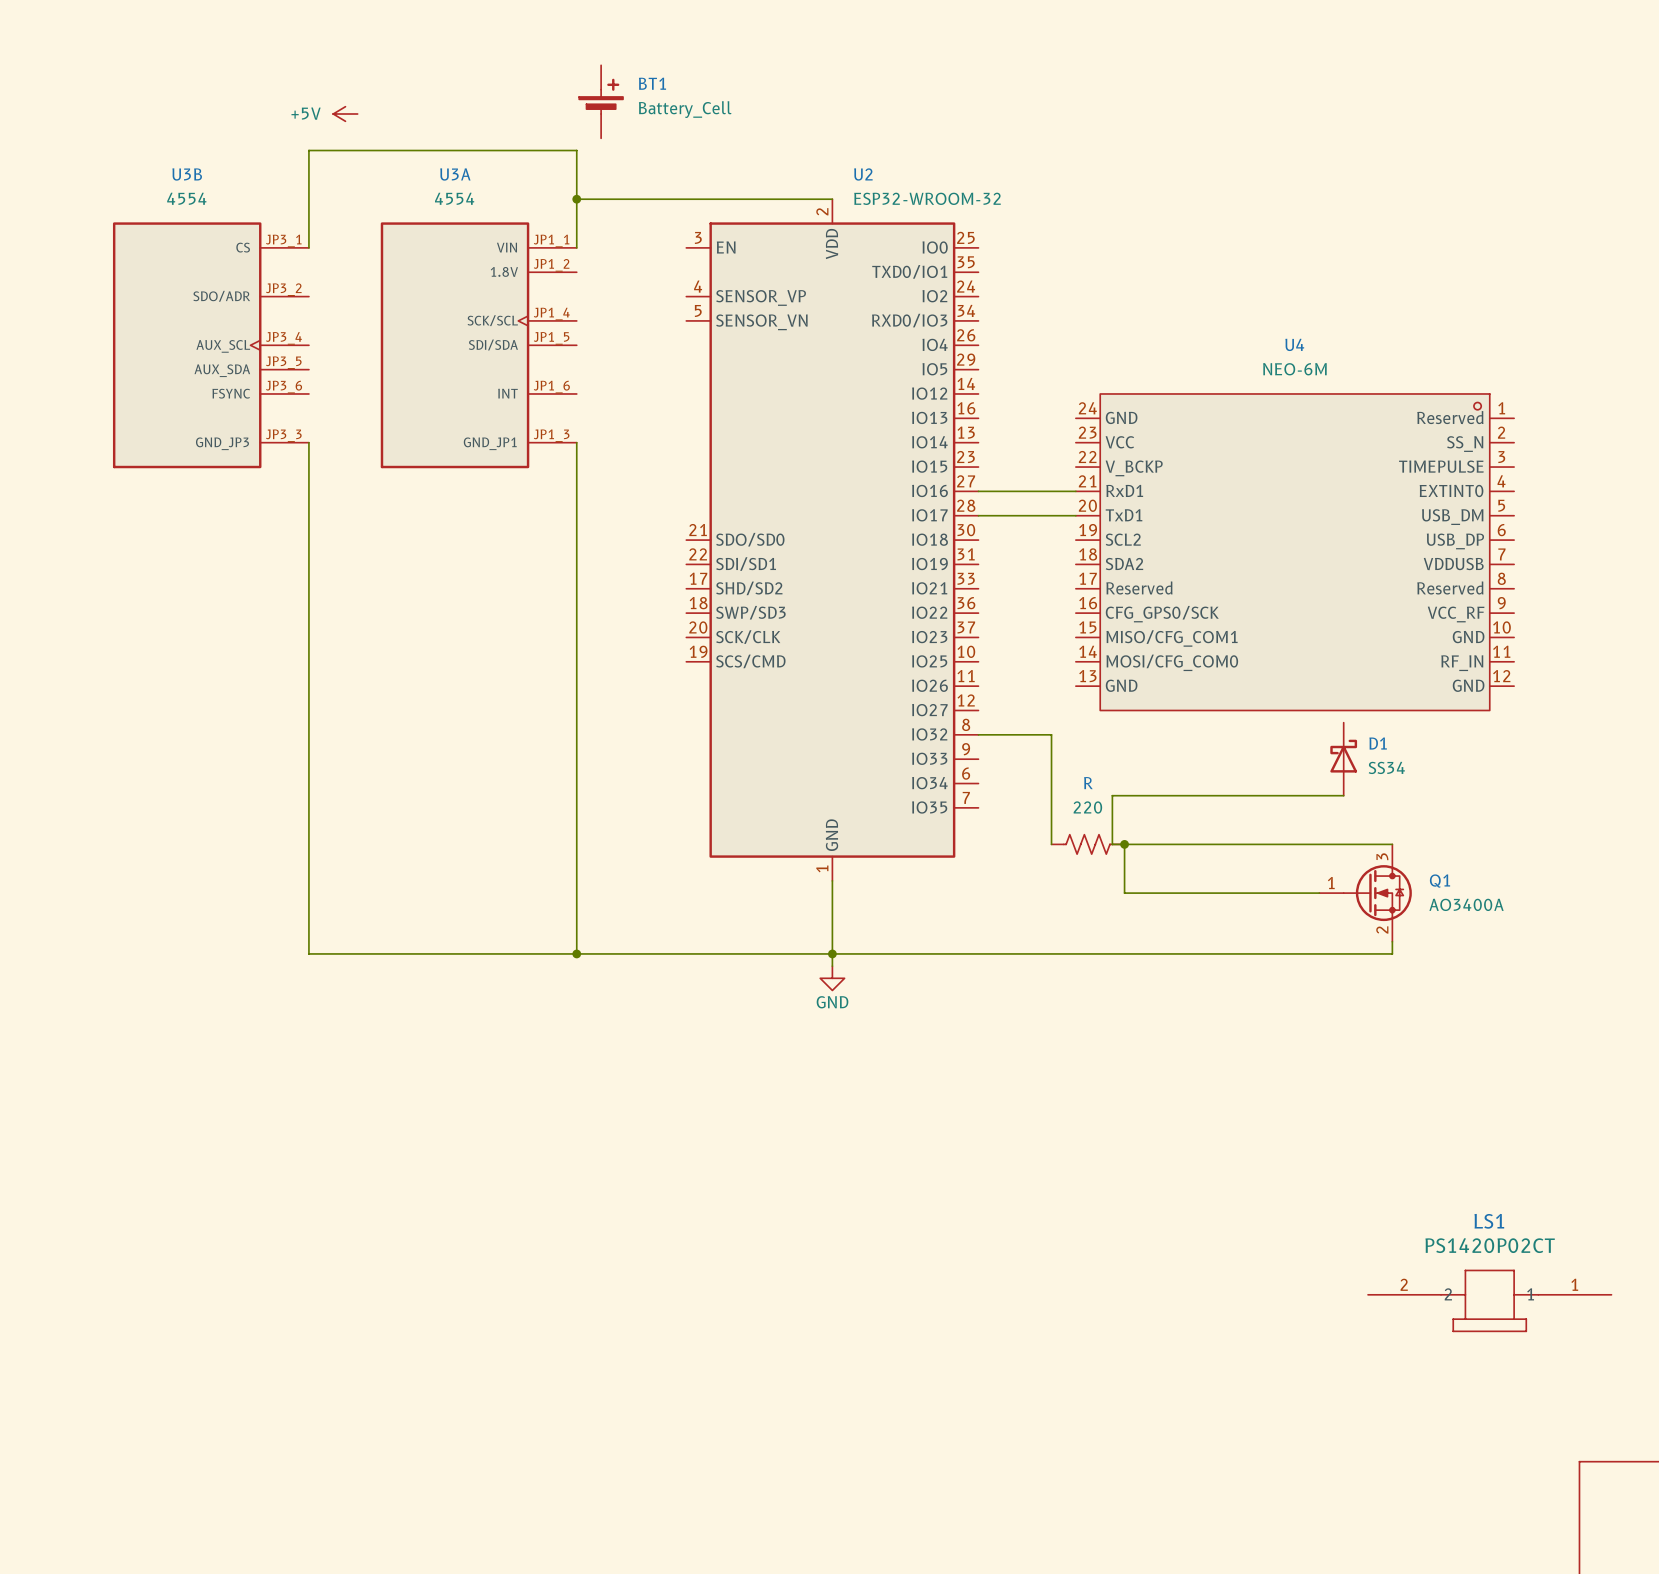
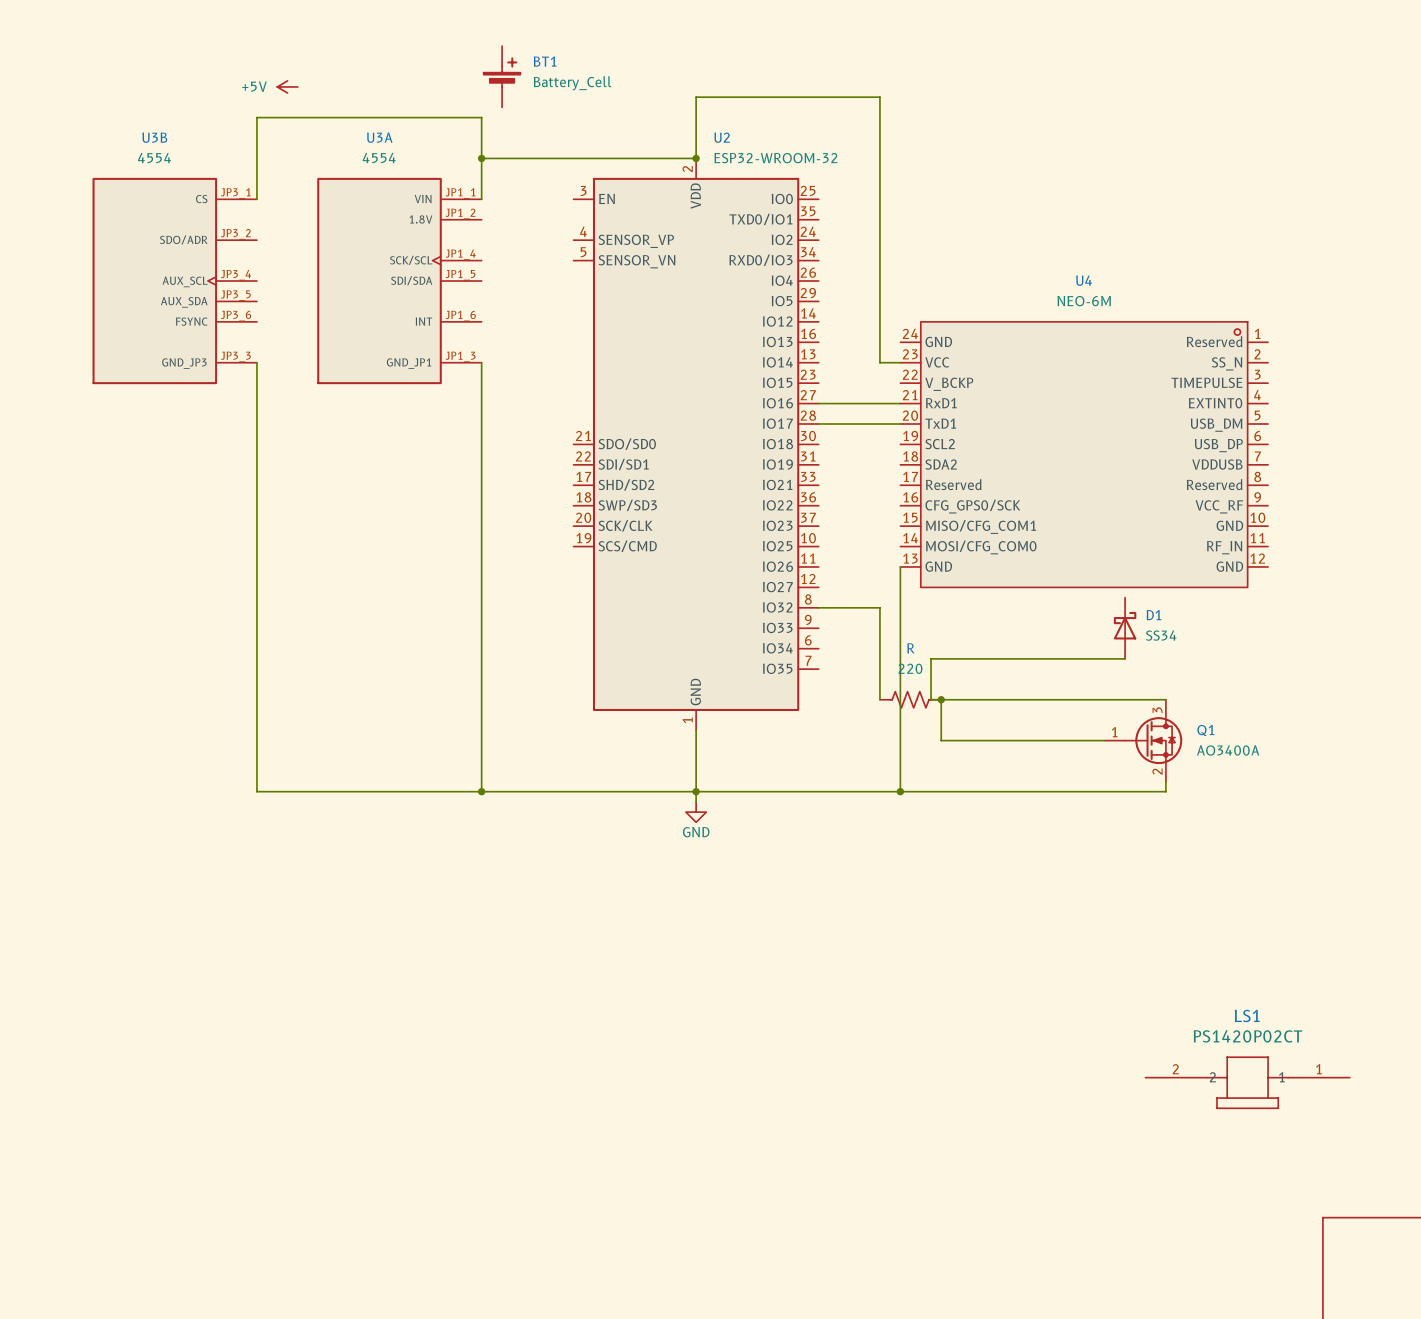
wire: none -> (696, 158) (696, 97) (879, 97) (879, 362) (900, 362)
junction: none -> (696, 158)
wire: none -> (900, 566) (900, 791)
junction: none -> (900, 791)

